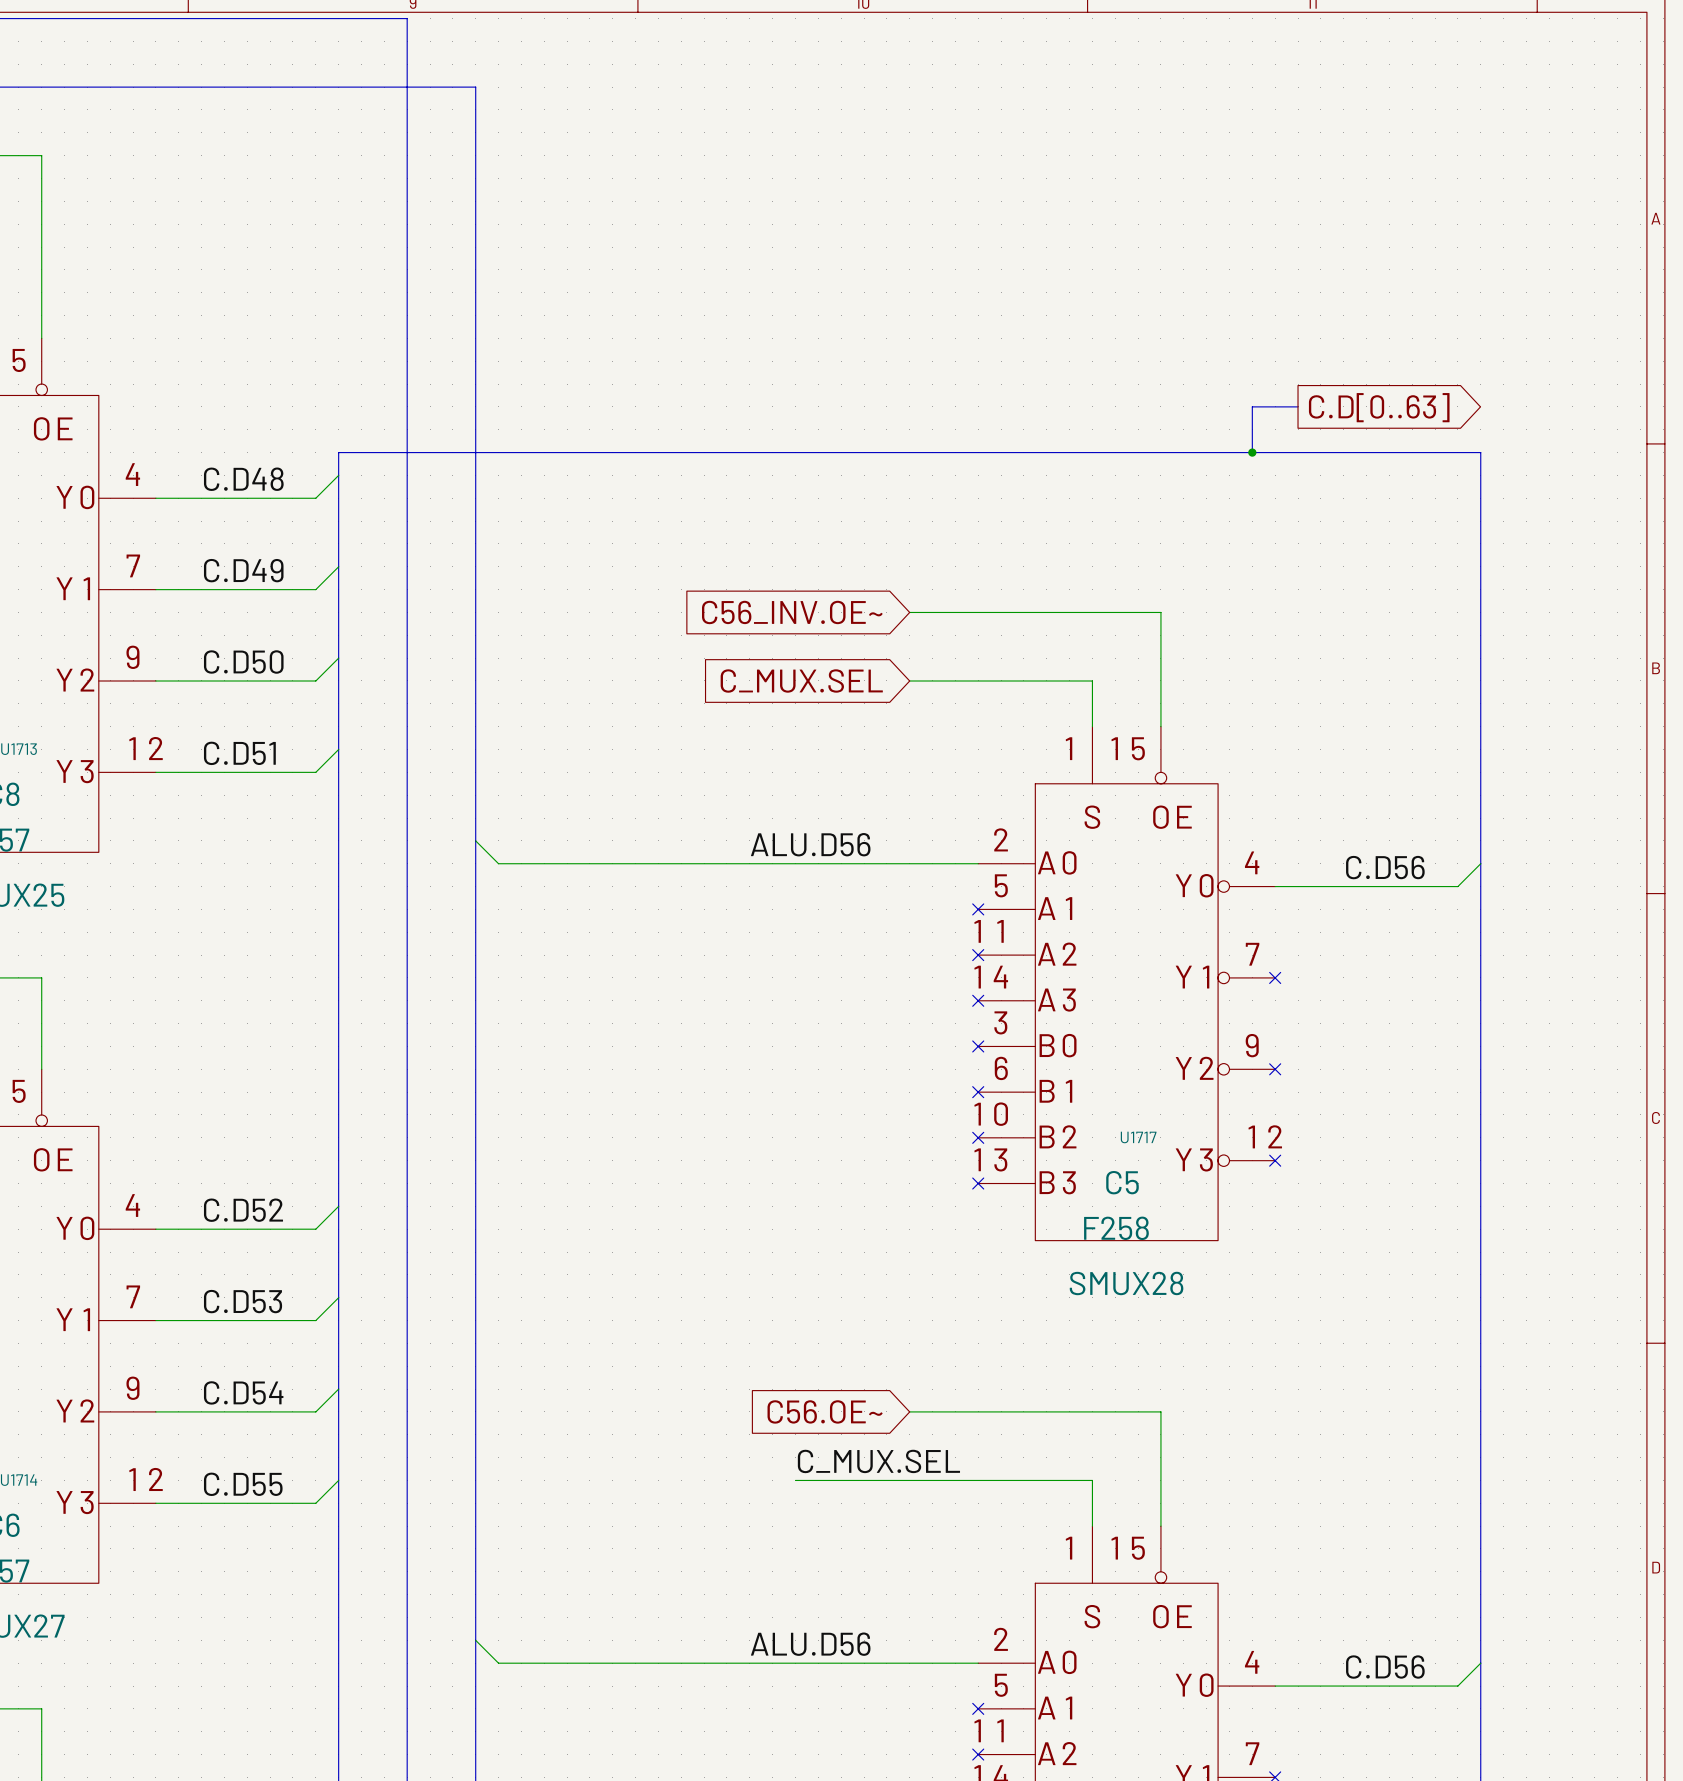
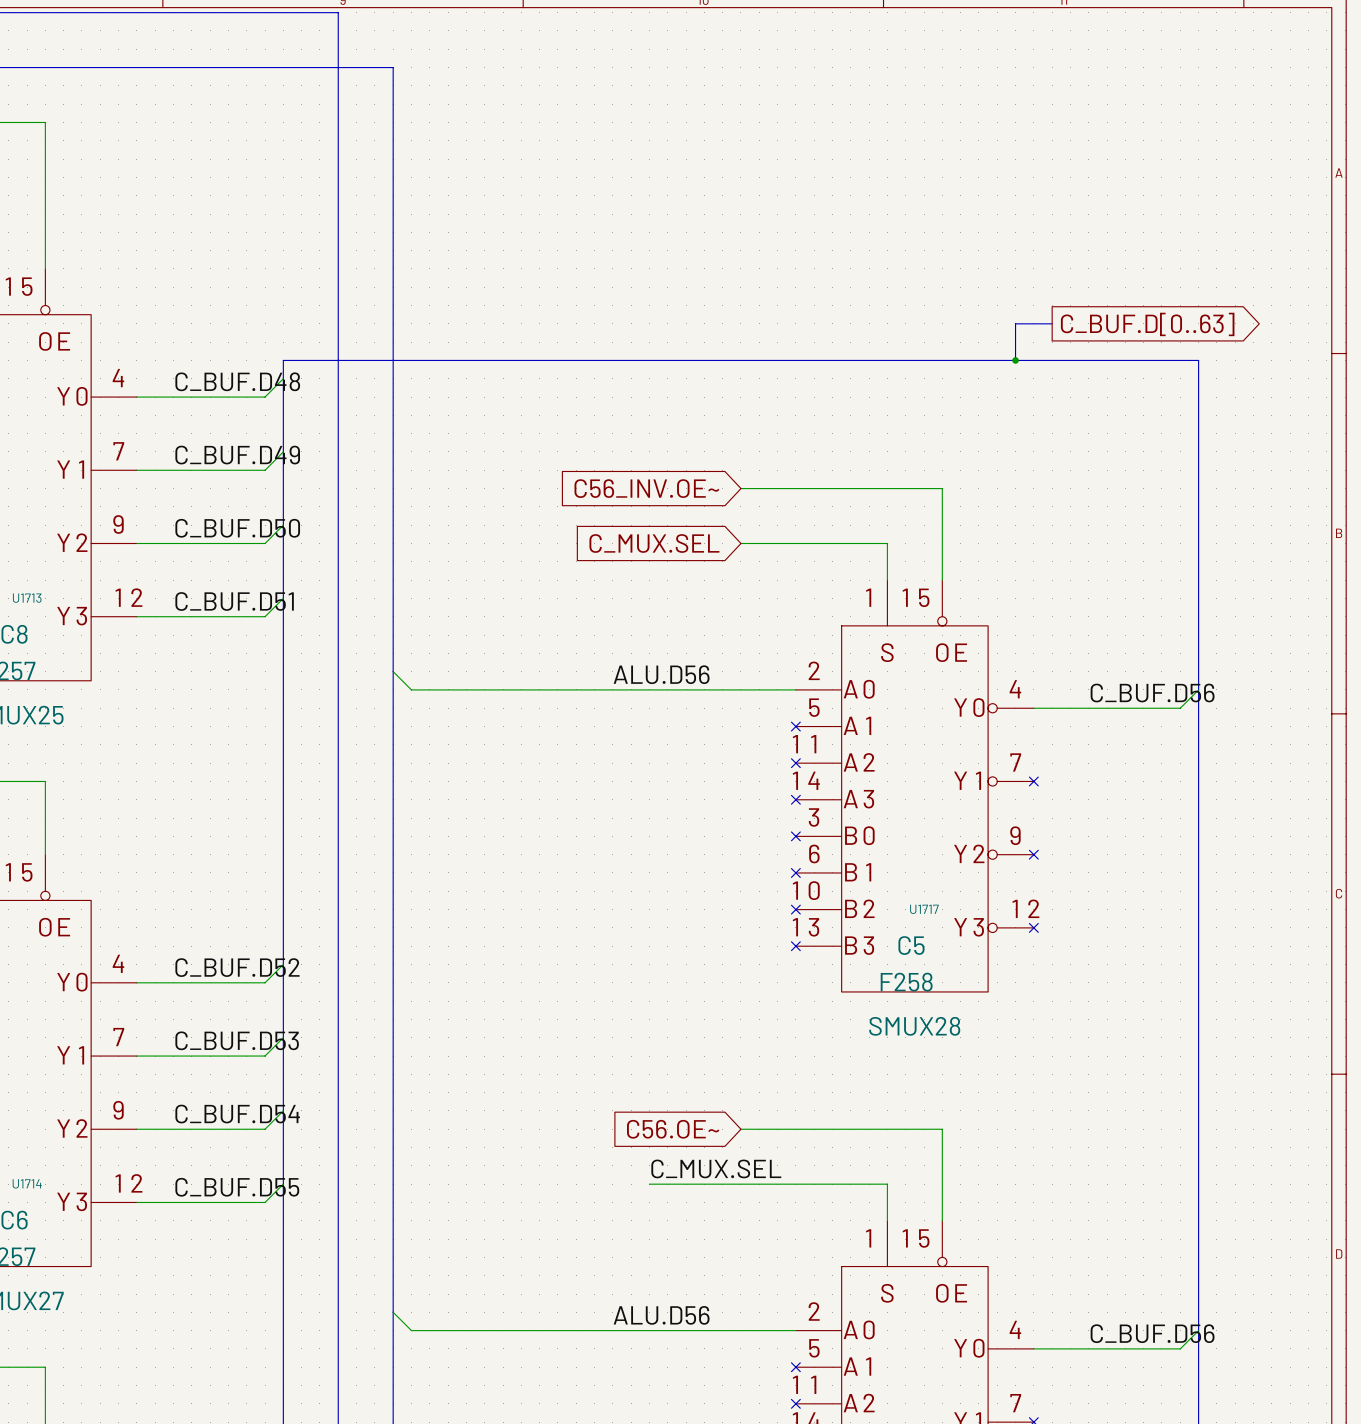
global label: C.D[0..63] (1379, 407) -> C_BUF.D[0..63] (1147, 324)
label: C.D48 (243, 479) -> C_BUF.D48 (237, 381)
label: C.D49 (243, 570) -> C_BUF.D49 (237, 455)
label: C.D50 (243, 662) -> C_BUF.D50 (237, 528)
label: C.D51 (239, 753) -> C_BUF.D51 (234, 601)
label: C.D56 (1385, 867) -> C_BUF.D56 (1152, 693)
label: C.D52 (243, 1210) -> C_BUF.D52 (237, 967)
label: C.D53 (243, 1301) -> C_BUF.D53 (237, 1040)
label: C.D54 (243, 1392) -> C_BUF.D54 (237, 1114)
label: C.D55 (243, 1484) -> C_BUF.D55 (237, 1187)
label: C.D56 (1385, 1667) -> C_BUF.D56 (1152, 1333)

